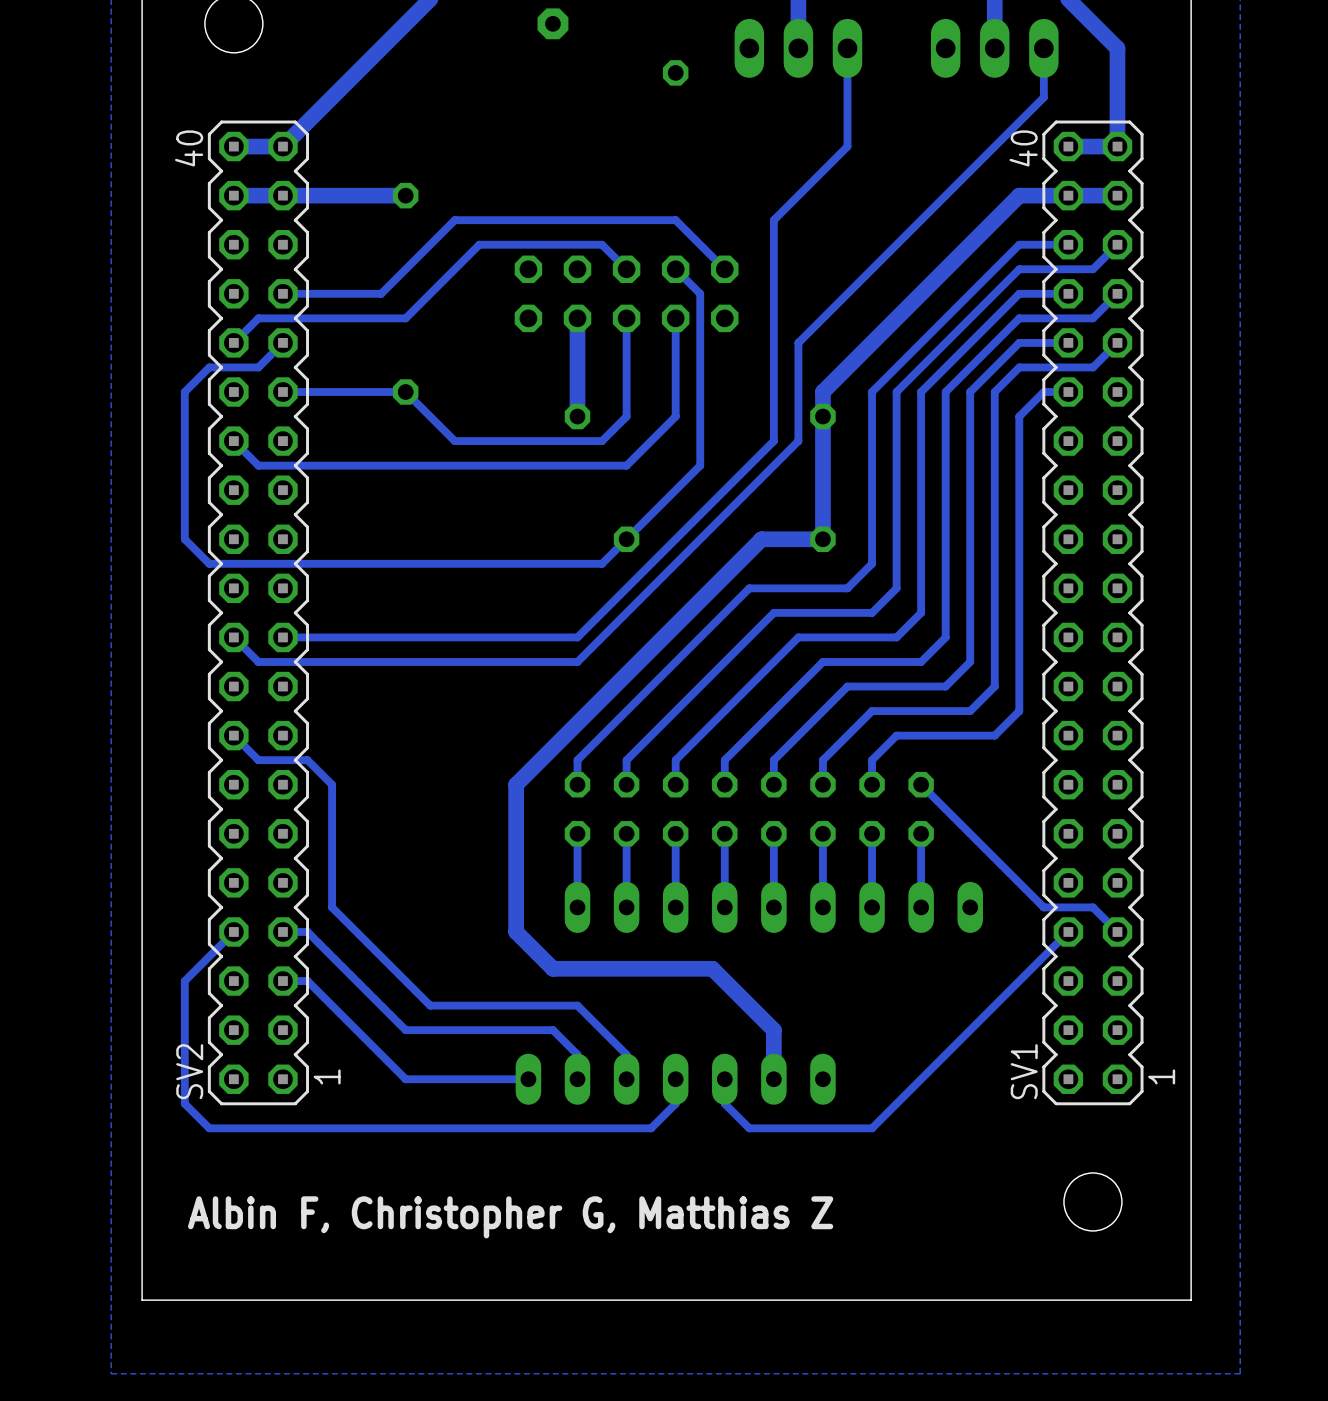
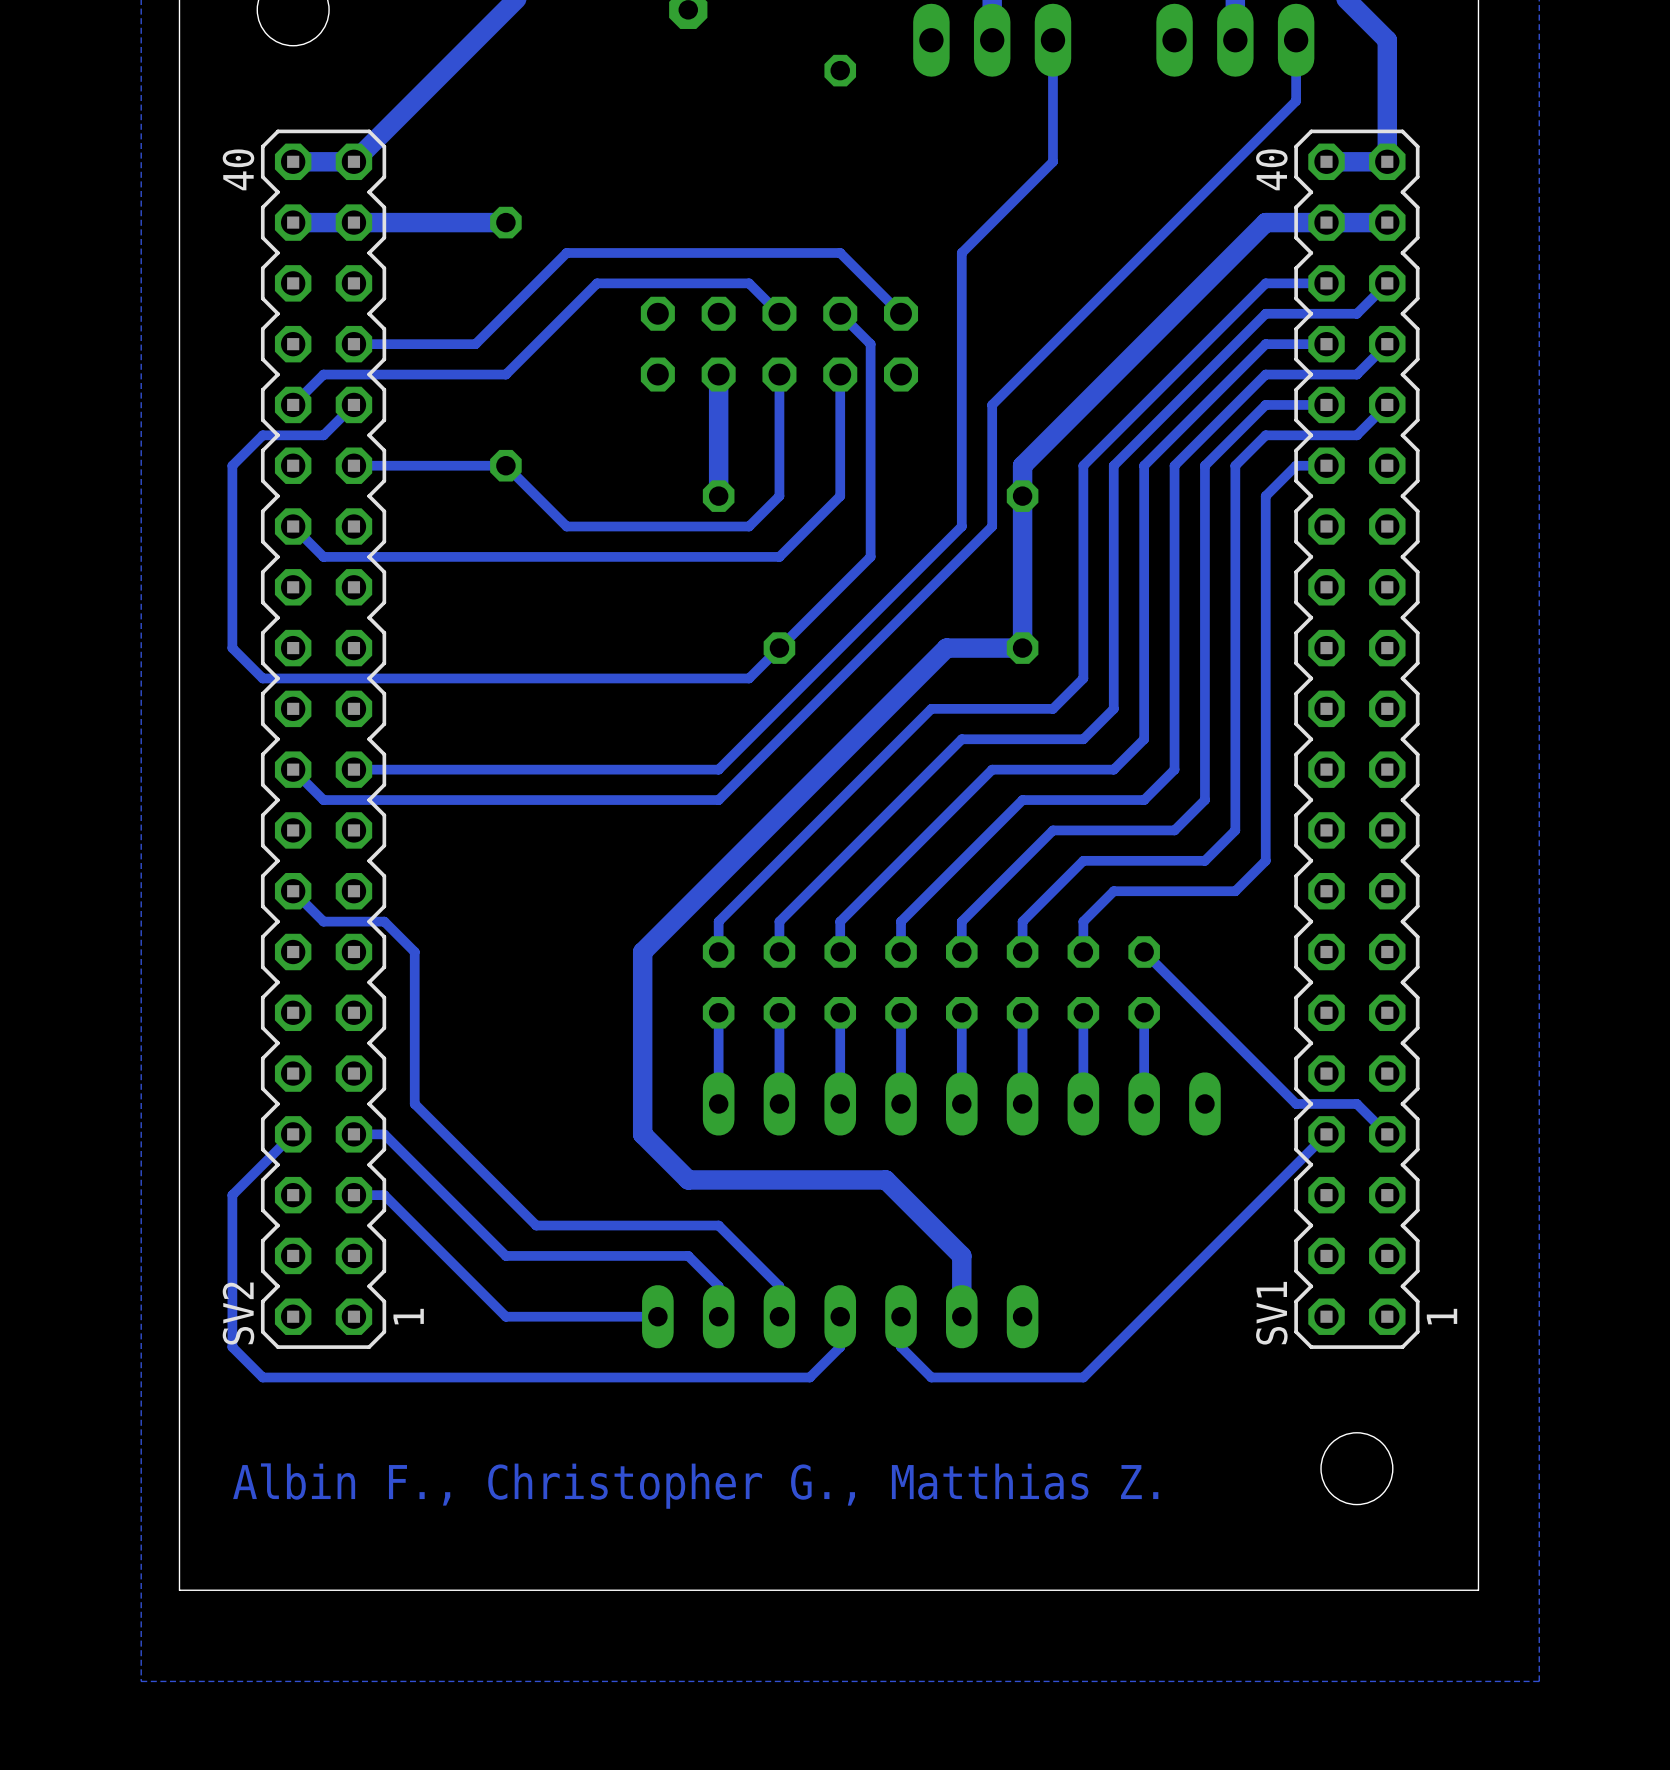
text: Albin F, Christopher G, Matthias Z (510, 1217) -> Albin F., Christopher G., Matthias Z. (695, 1486)

